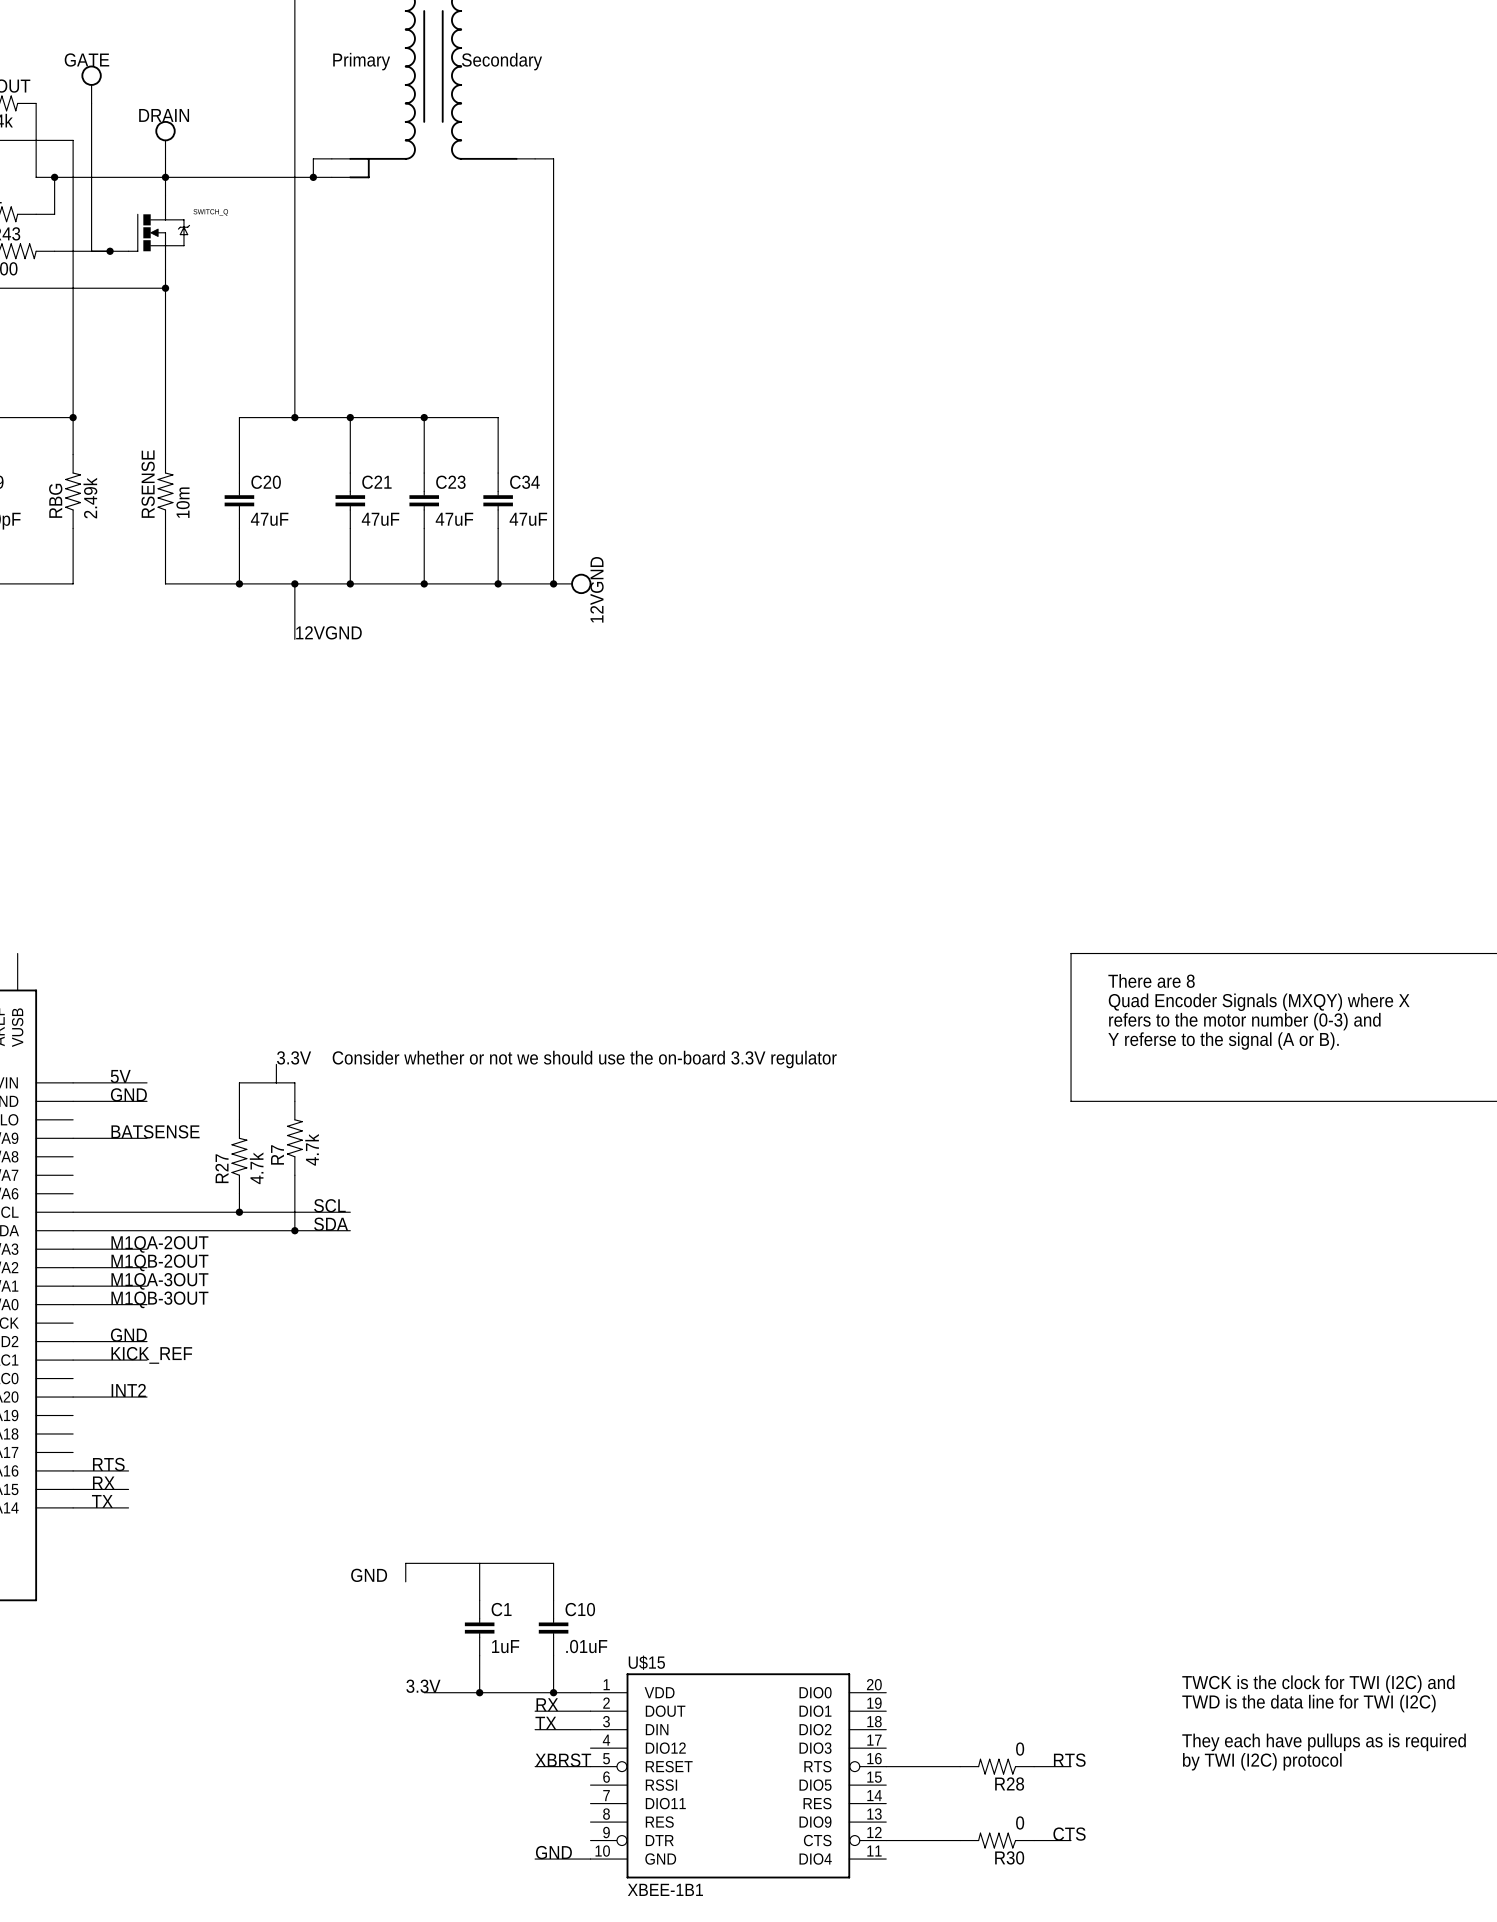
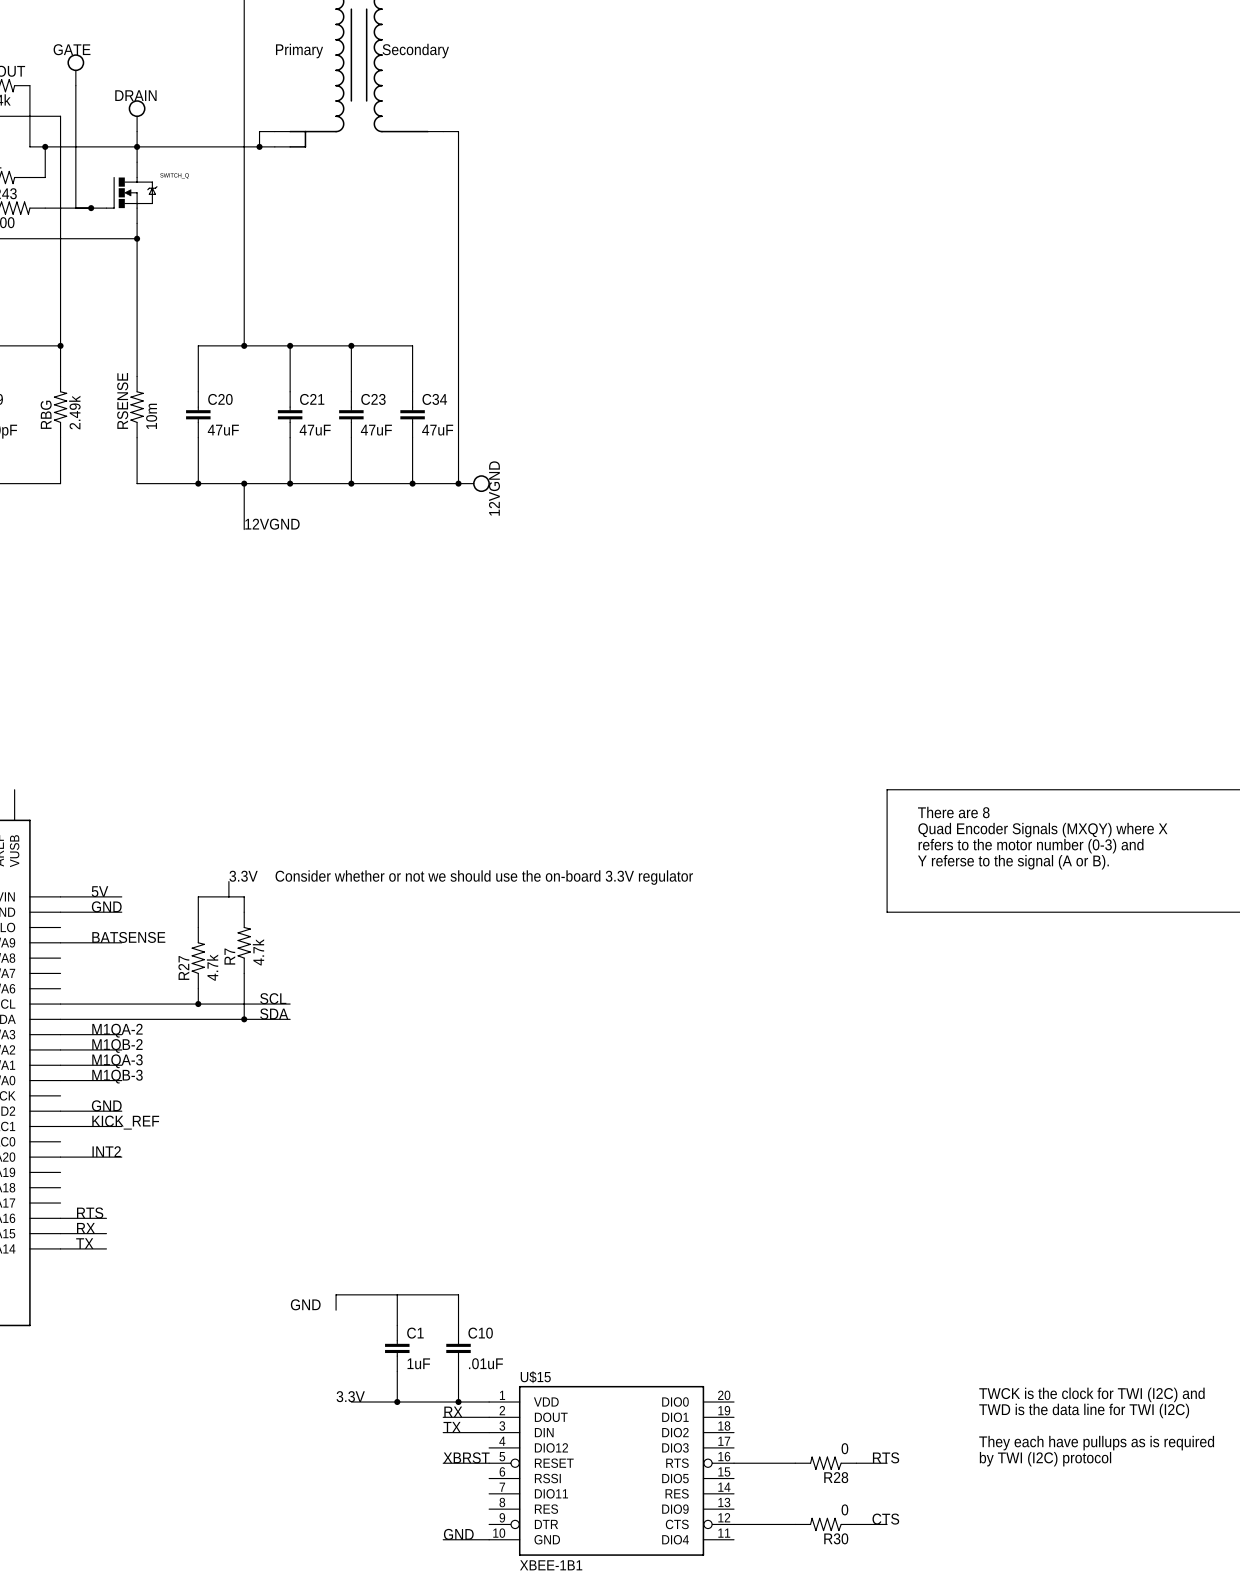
label: M1QA-2OUT (159, 1244) -> M1QA-2 (117, 1030)
label: M1QB-2OUT (159, 1262) -> M1QB-2 (117, 1045)
label: M1QA-3OUT (159, 1281) -> M1QA-3 (117, 1061)
label: M1QB-3OUT (159, 1299) -> M1QB-3 (117, 1076)

